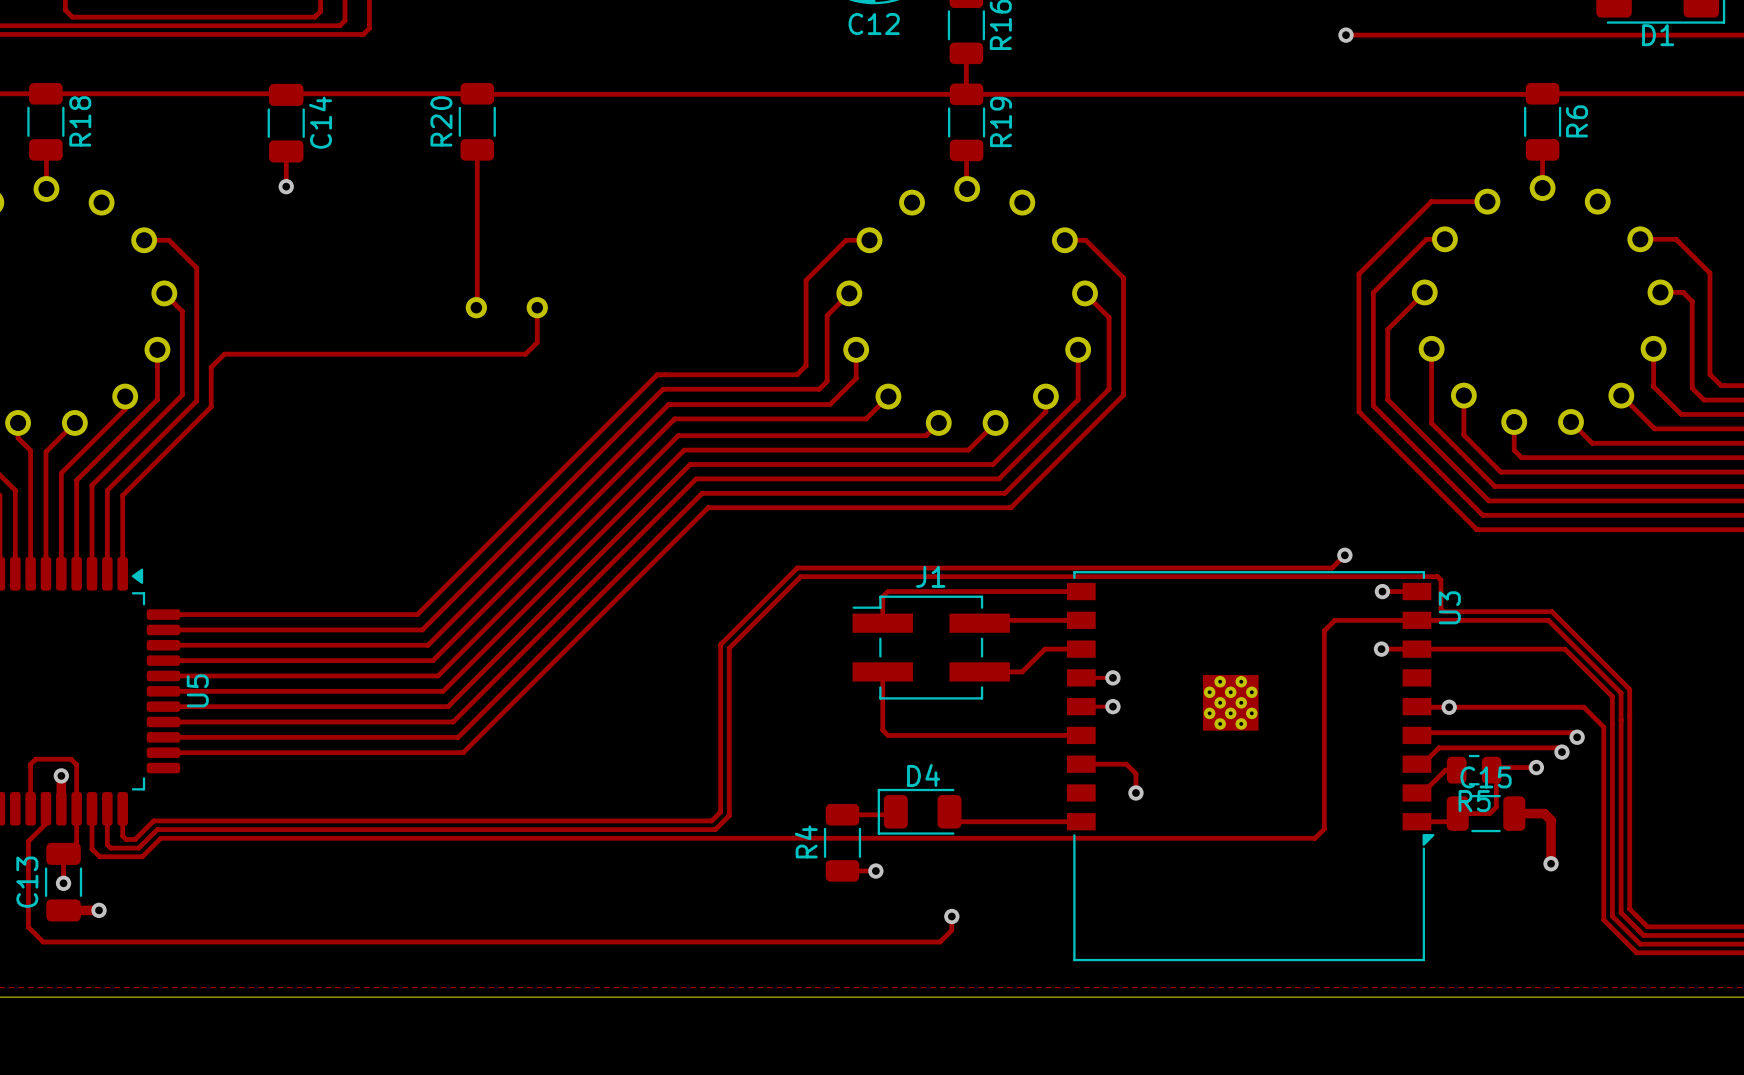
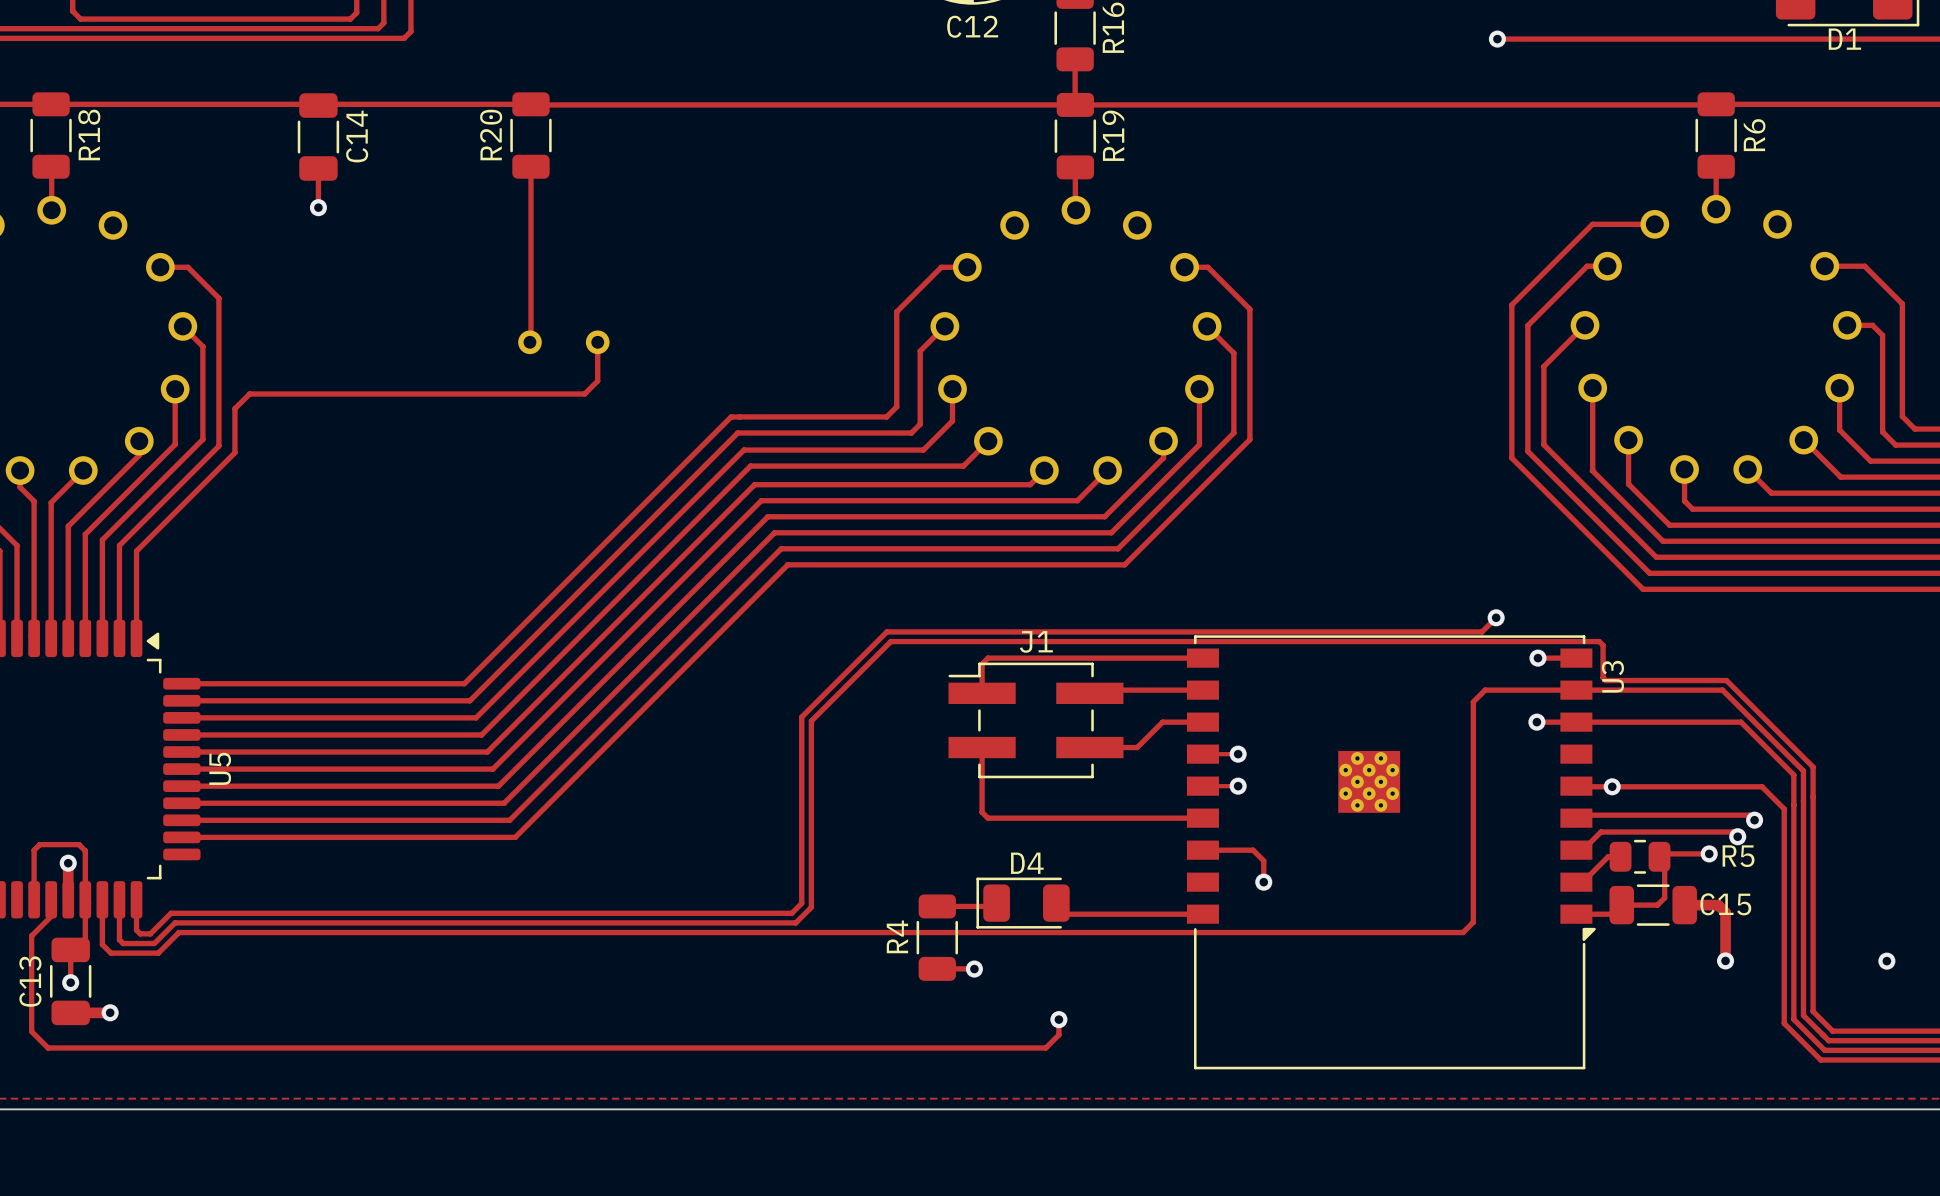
C15 name position: C15 (1486, 777) -> C15 (1725, 904)
R5 name position: R5 (1474, 801) -> R5 (1738, 856)
via: none -> (1886, 961)

